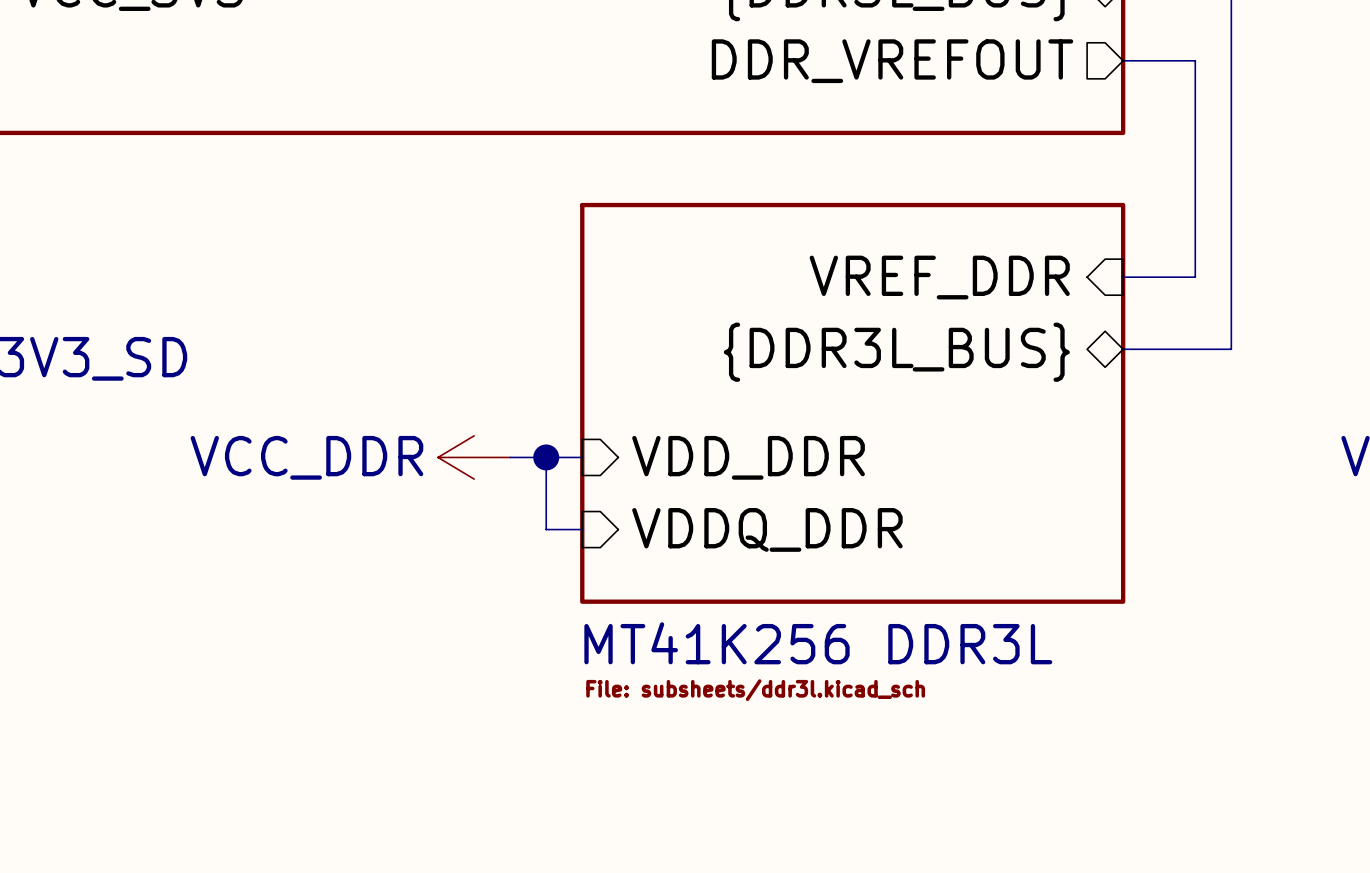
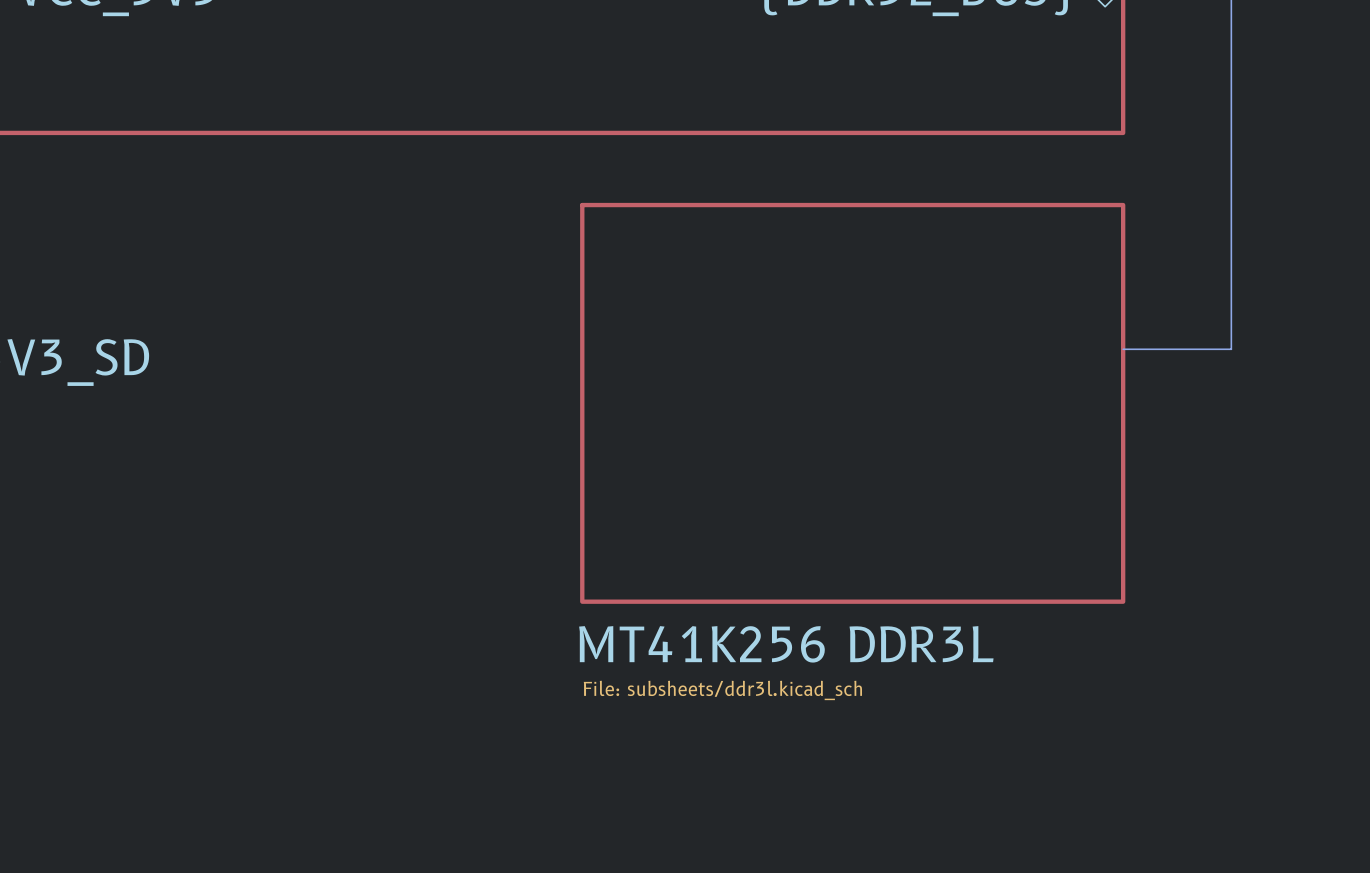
wire: (1123, 60) (1195, 60) (1195, 277) (1123, 277) -> none
sheet pin: DDR_VREFOUT (892, 61) -> none
sheet pin: VREF_DDR (939, 277) -> none
sheet pin: {DDR3L_BUS} (896, 352) -> none
power symbol: VCC_DDR (474, 457) -> none
wire: (510, 457) (582, 457) -> none
wire: (546, 457) (546, 529) (582, 529) -> none
junction: (546, 457) -> none
sheet pin: VDD_DDR (748, 457) -> none
sheet pin: VDDQ_DDR (767, 529) -> none

